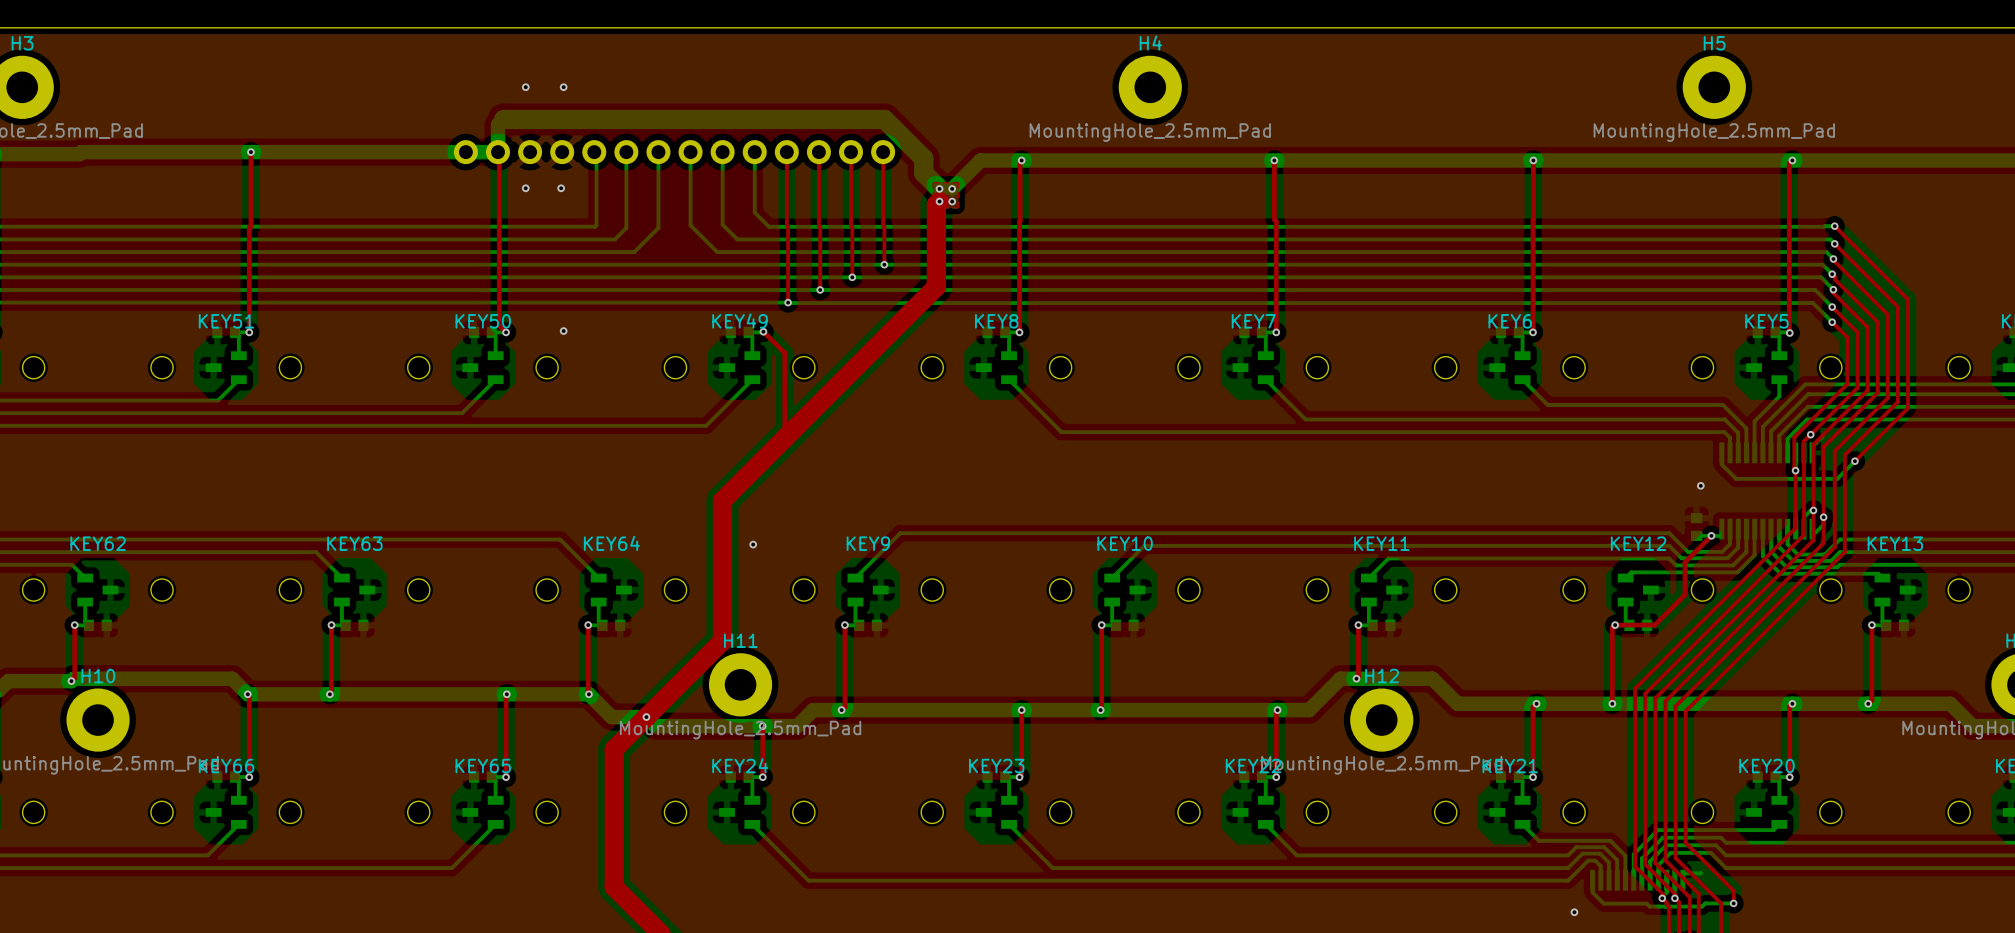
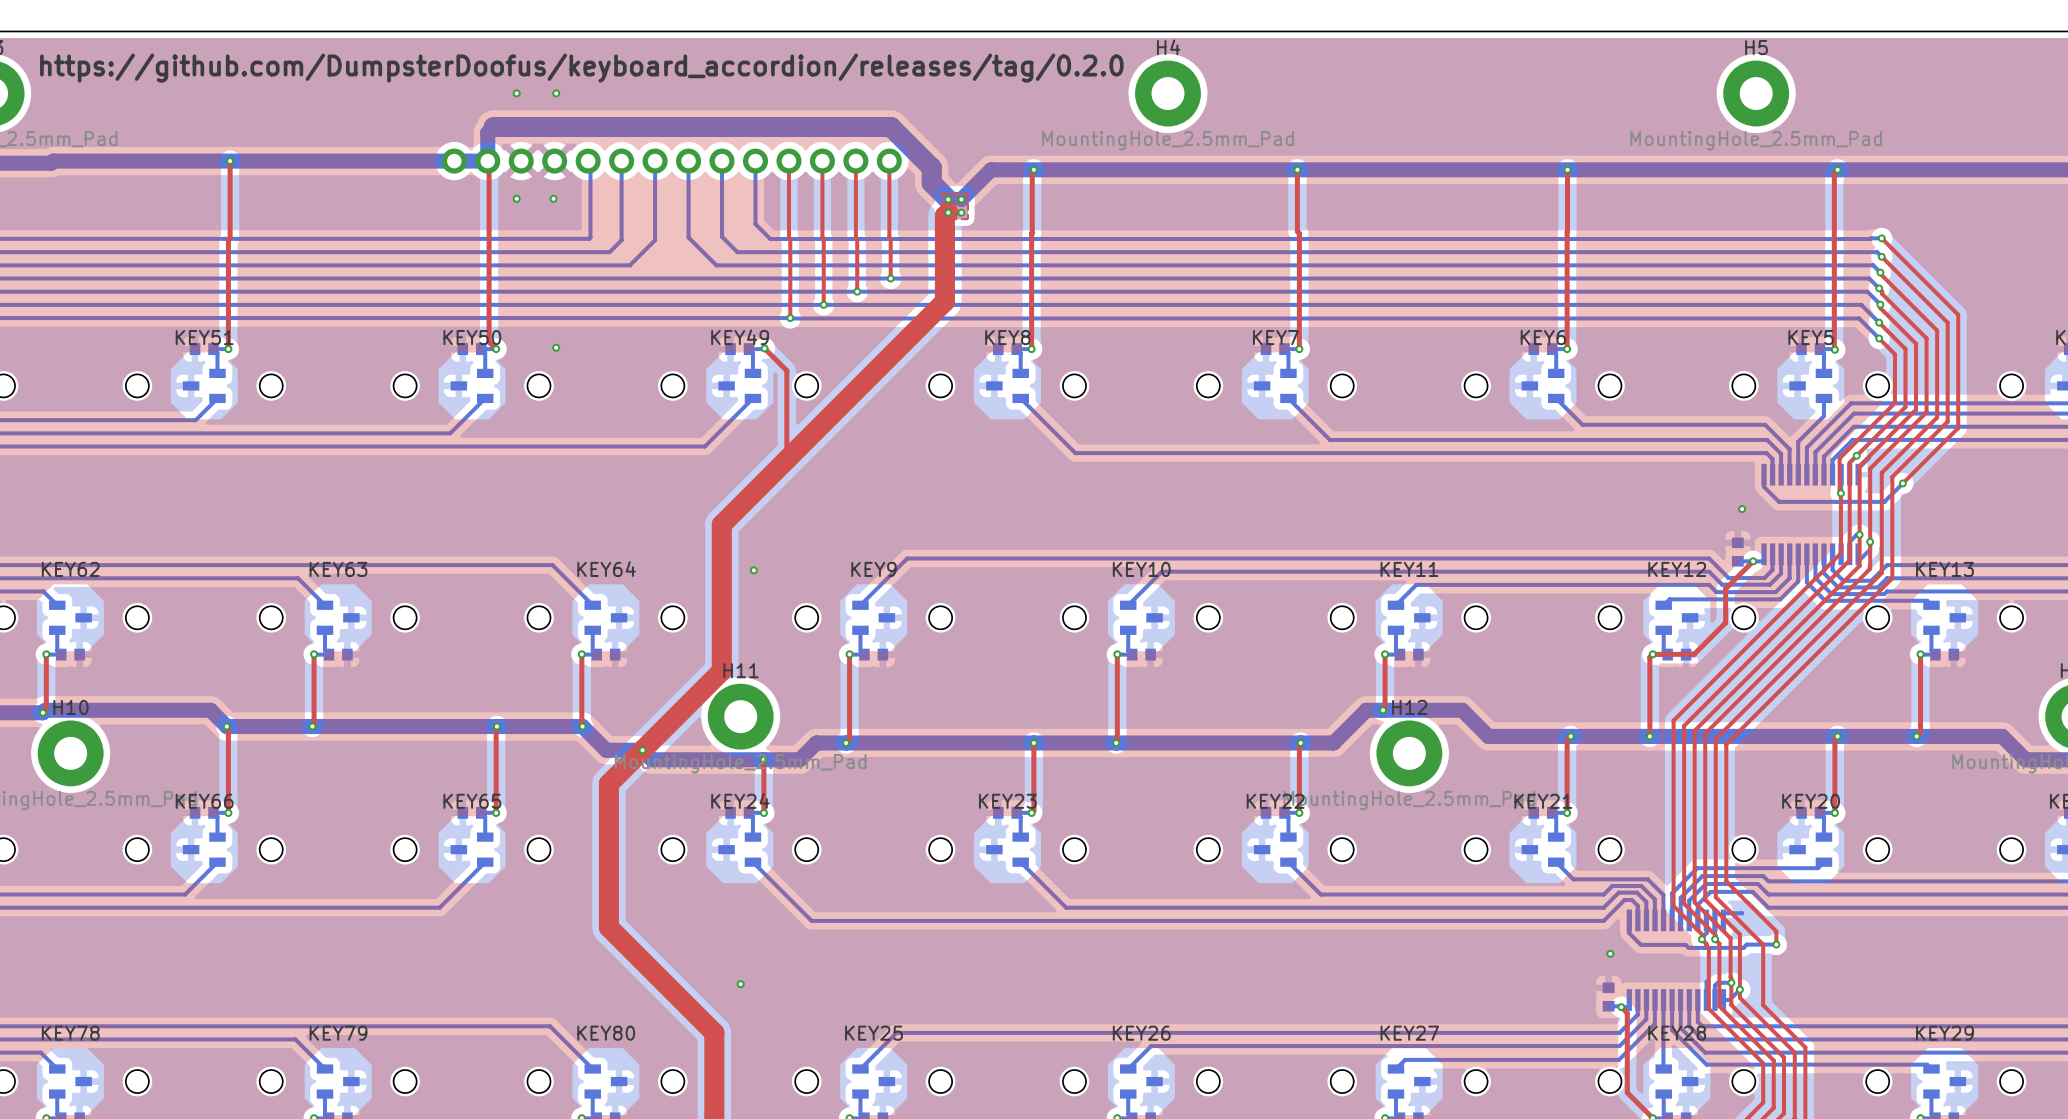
text: none -> https://github.com/DumpsterDoofus/keyboard_accordion/releases/tag/0.2.0 (581, 68)

